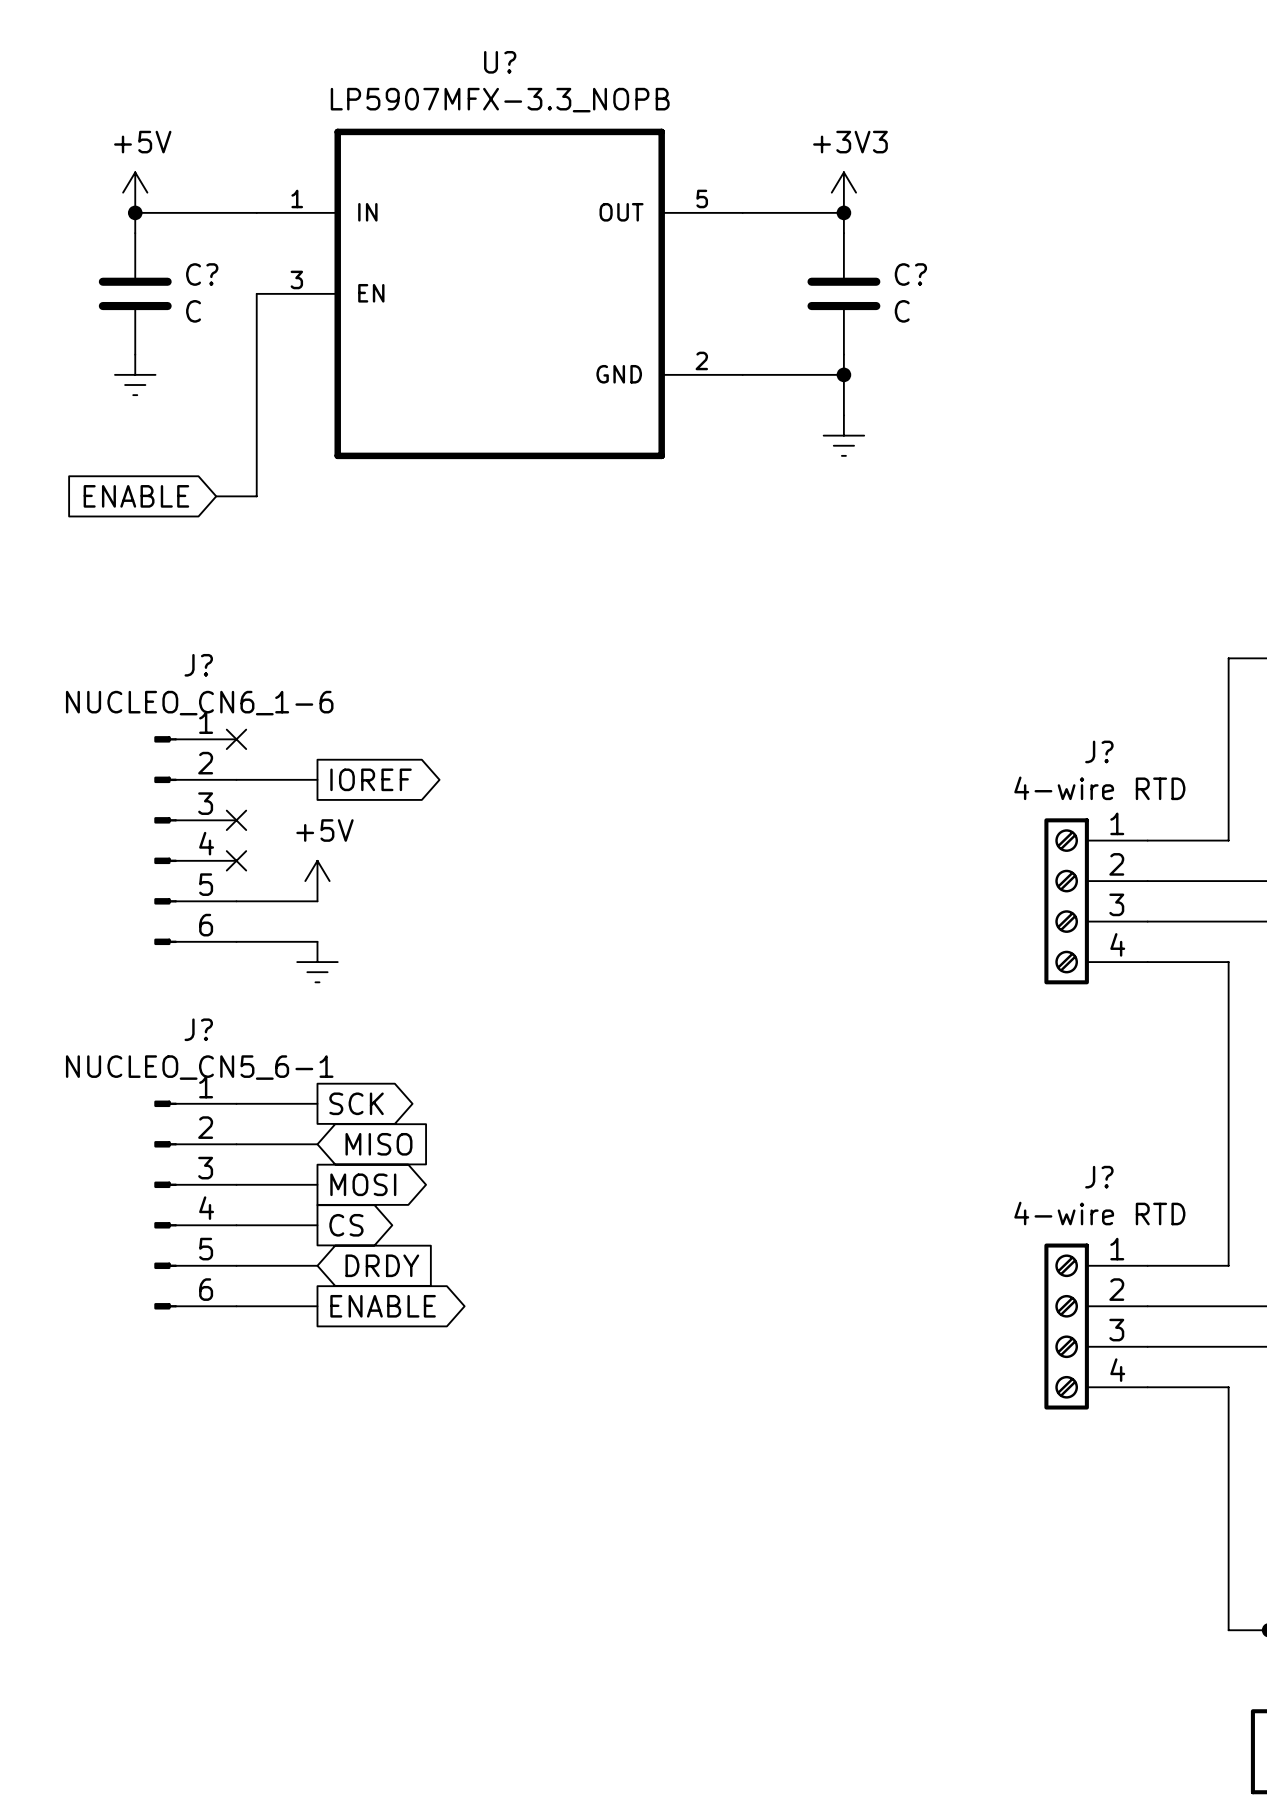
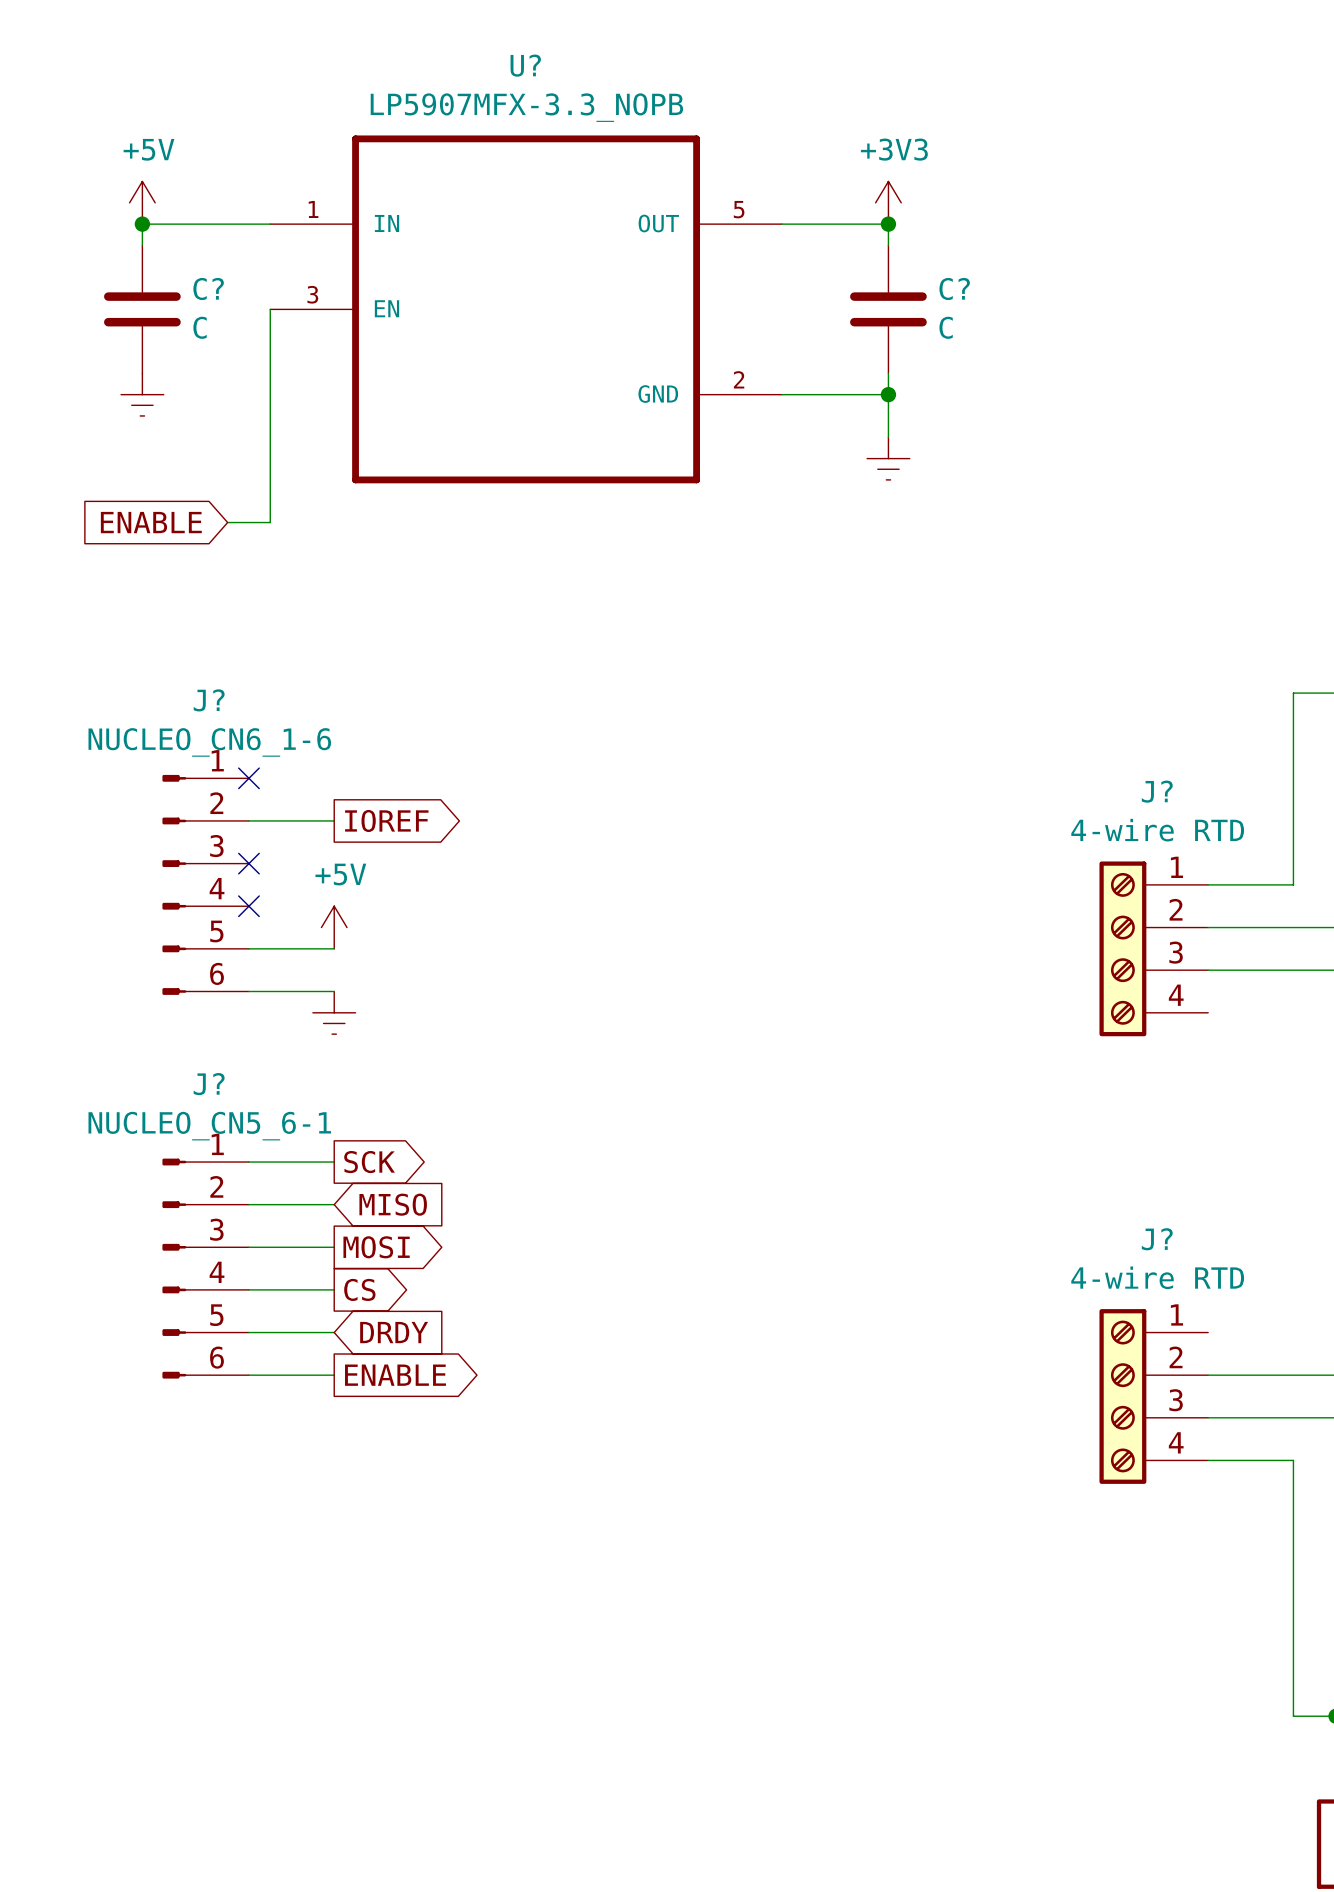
wire: (1147, 962) (1228, 962) (1228, 1265) (1147, 1265) -> none

